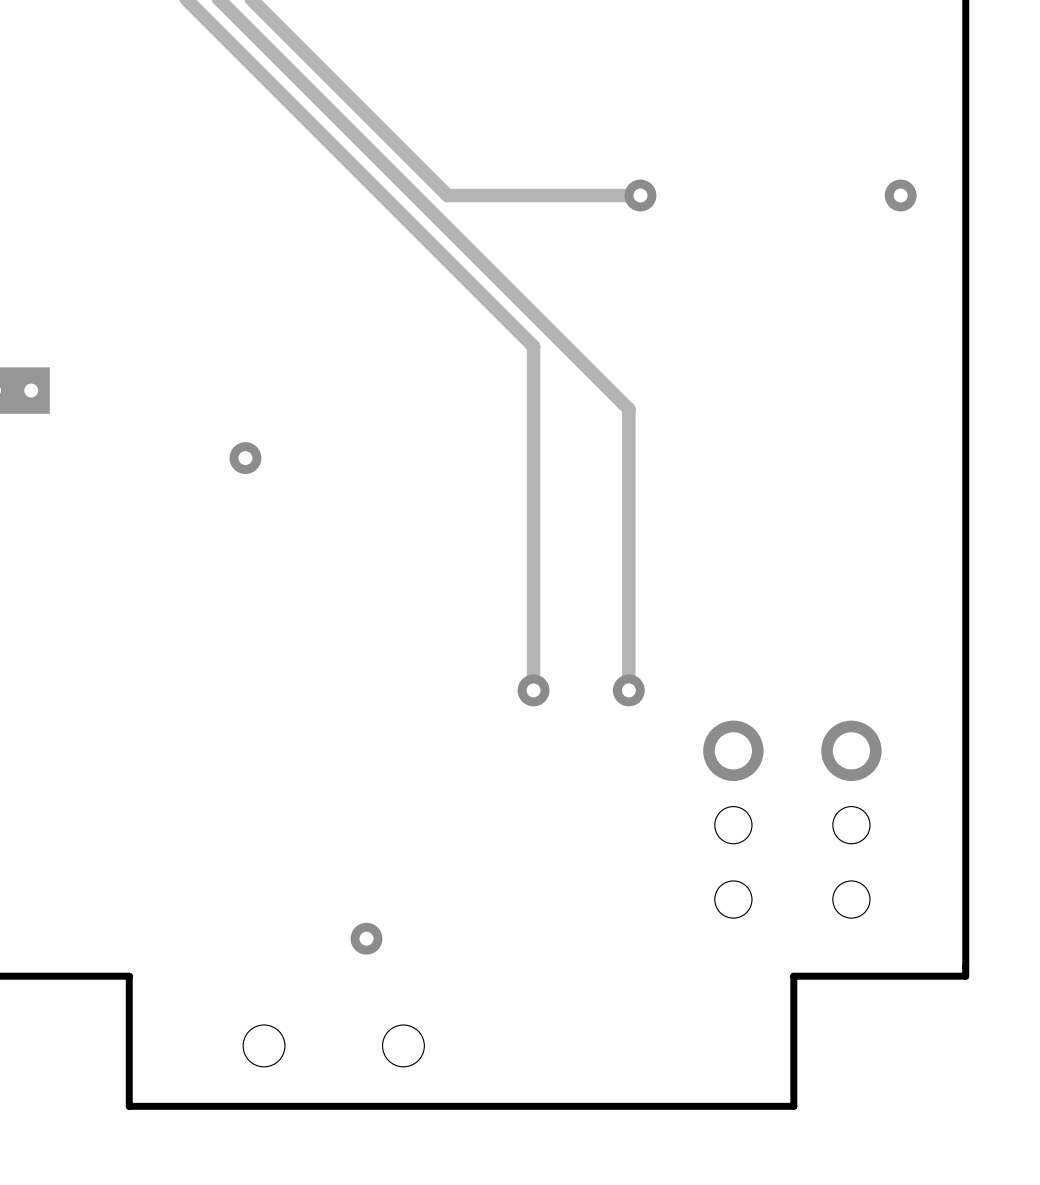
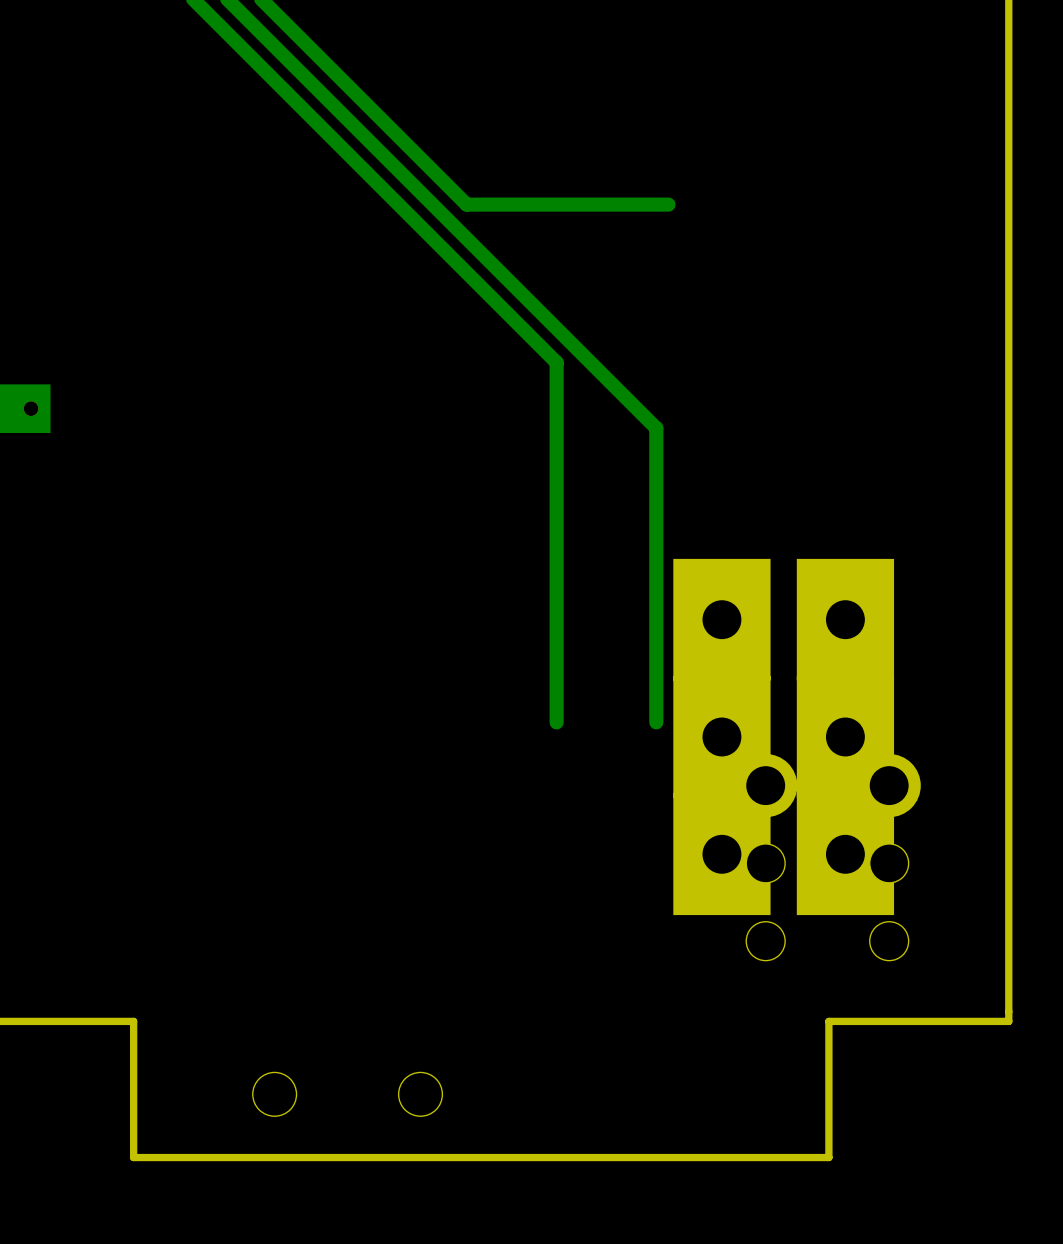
via: (640, 195) -> none
via: (900, 195) -> none
via: (245, 458) -> none
via: (533, 690) -> none
via: (628, 690) -> none
part: none -> (783, 736)
via: (366, 938) -> none

